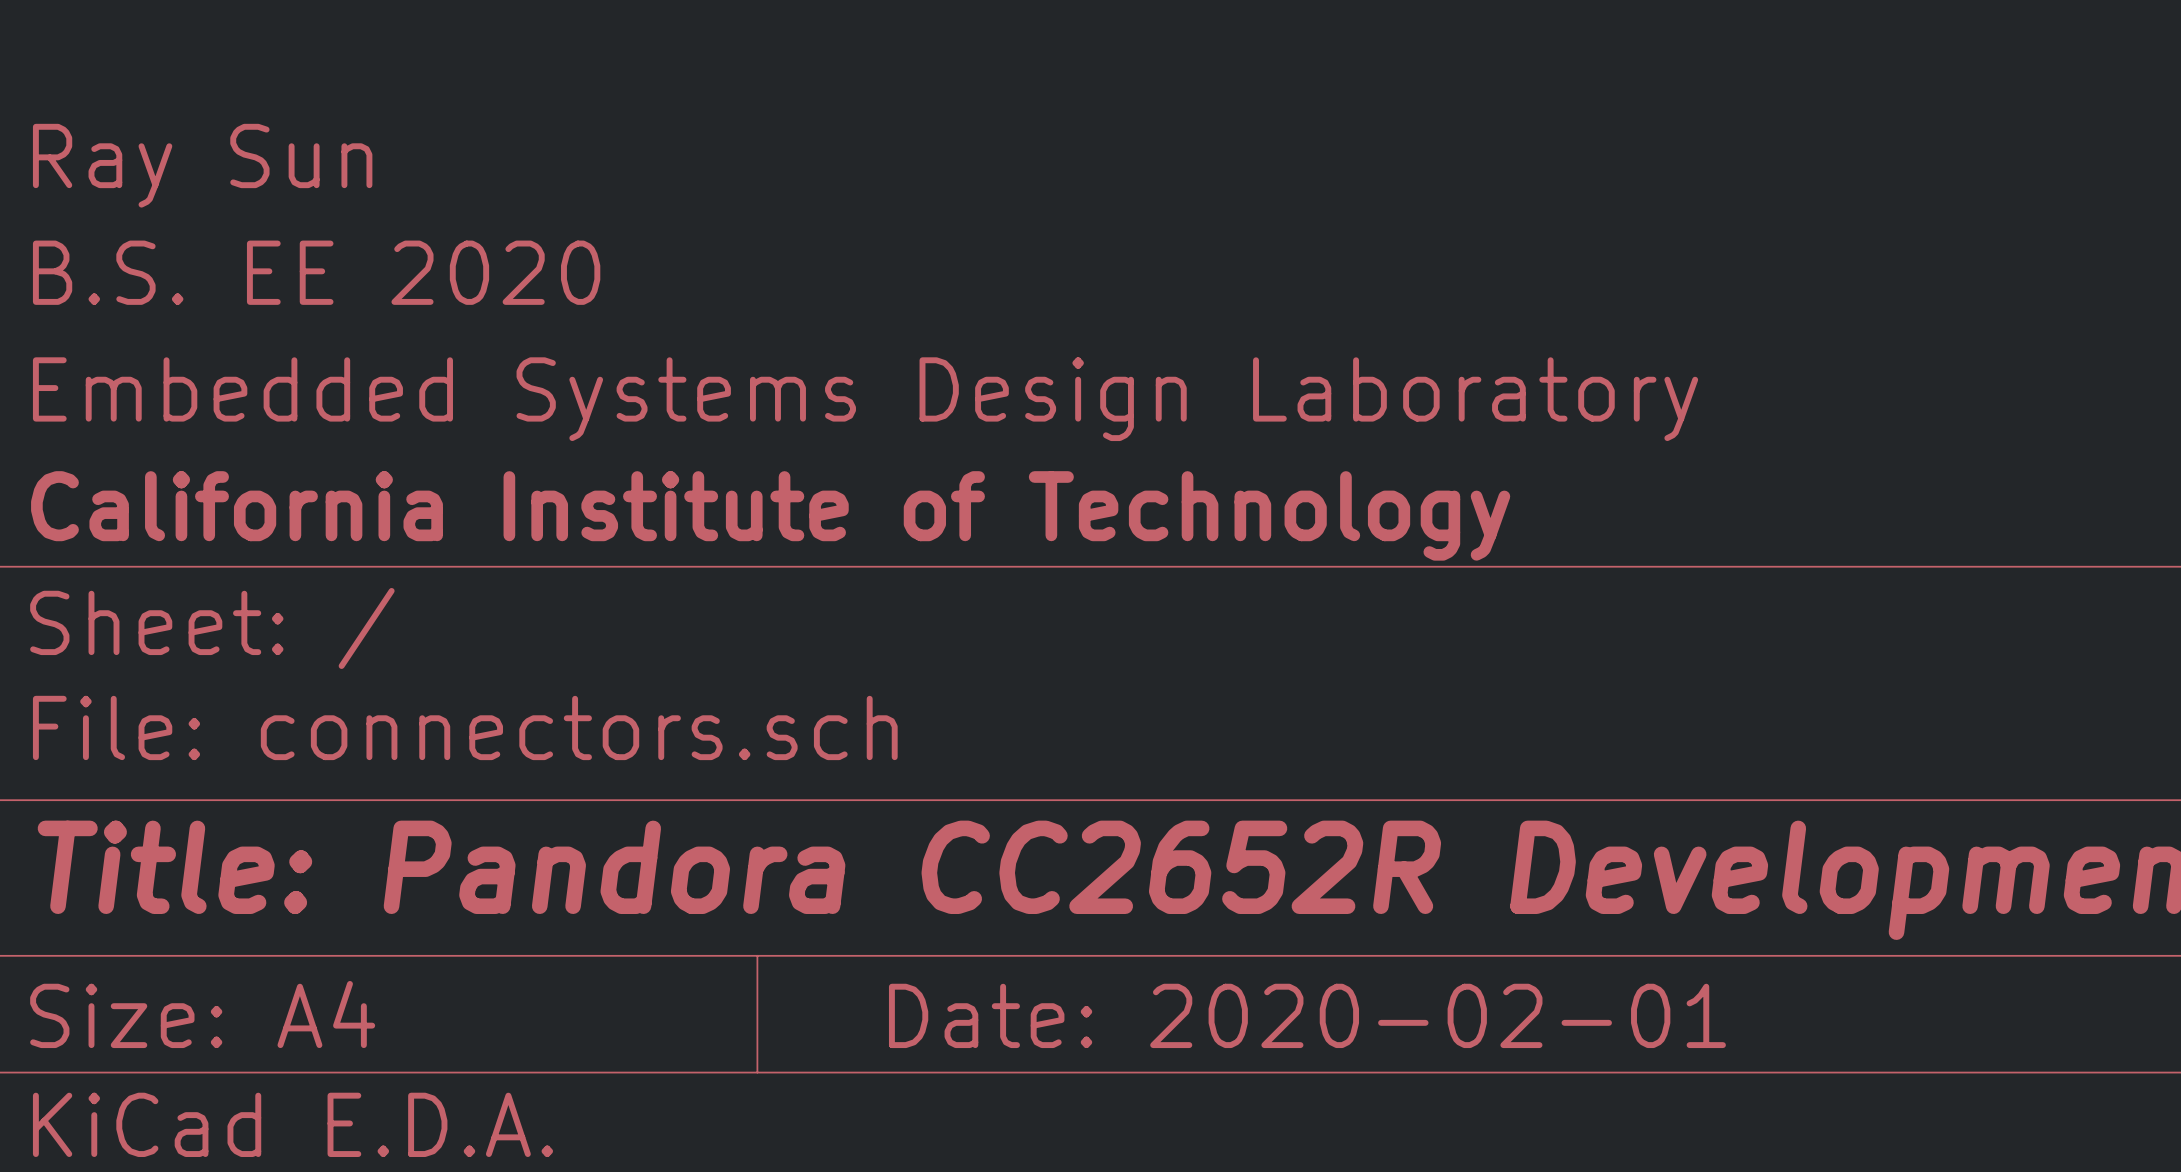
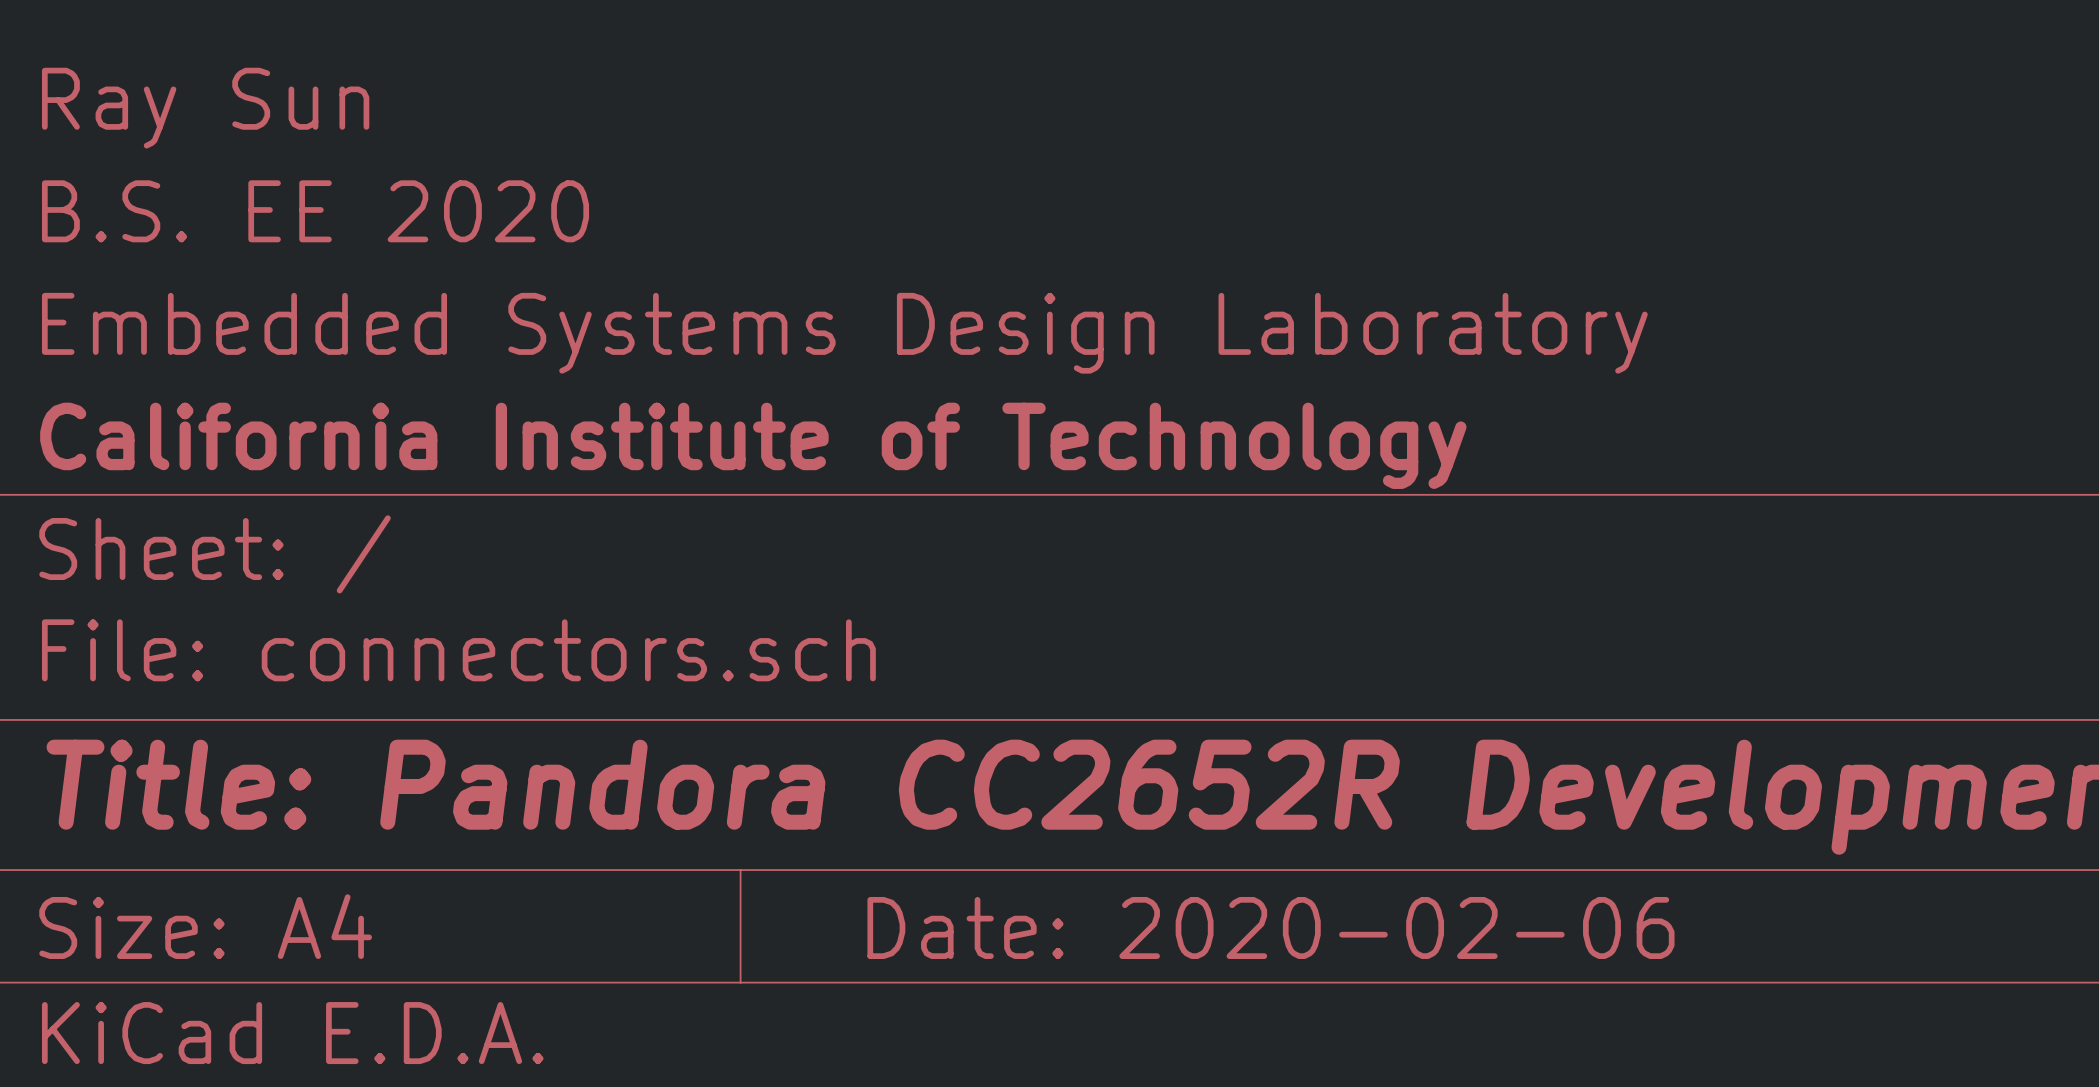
title block: Date: 2020-02-01 (1307, 1015) -> Date: 2020-02-06 (1270, 927)

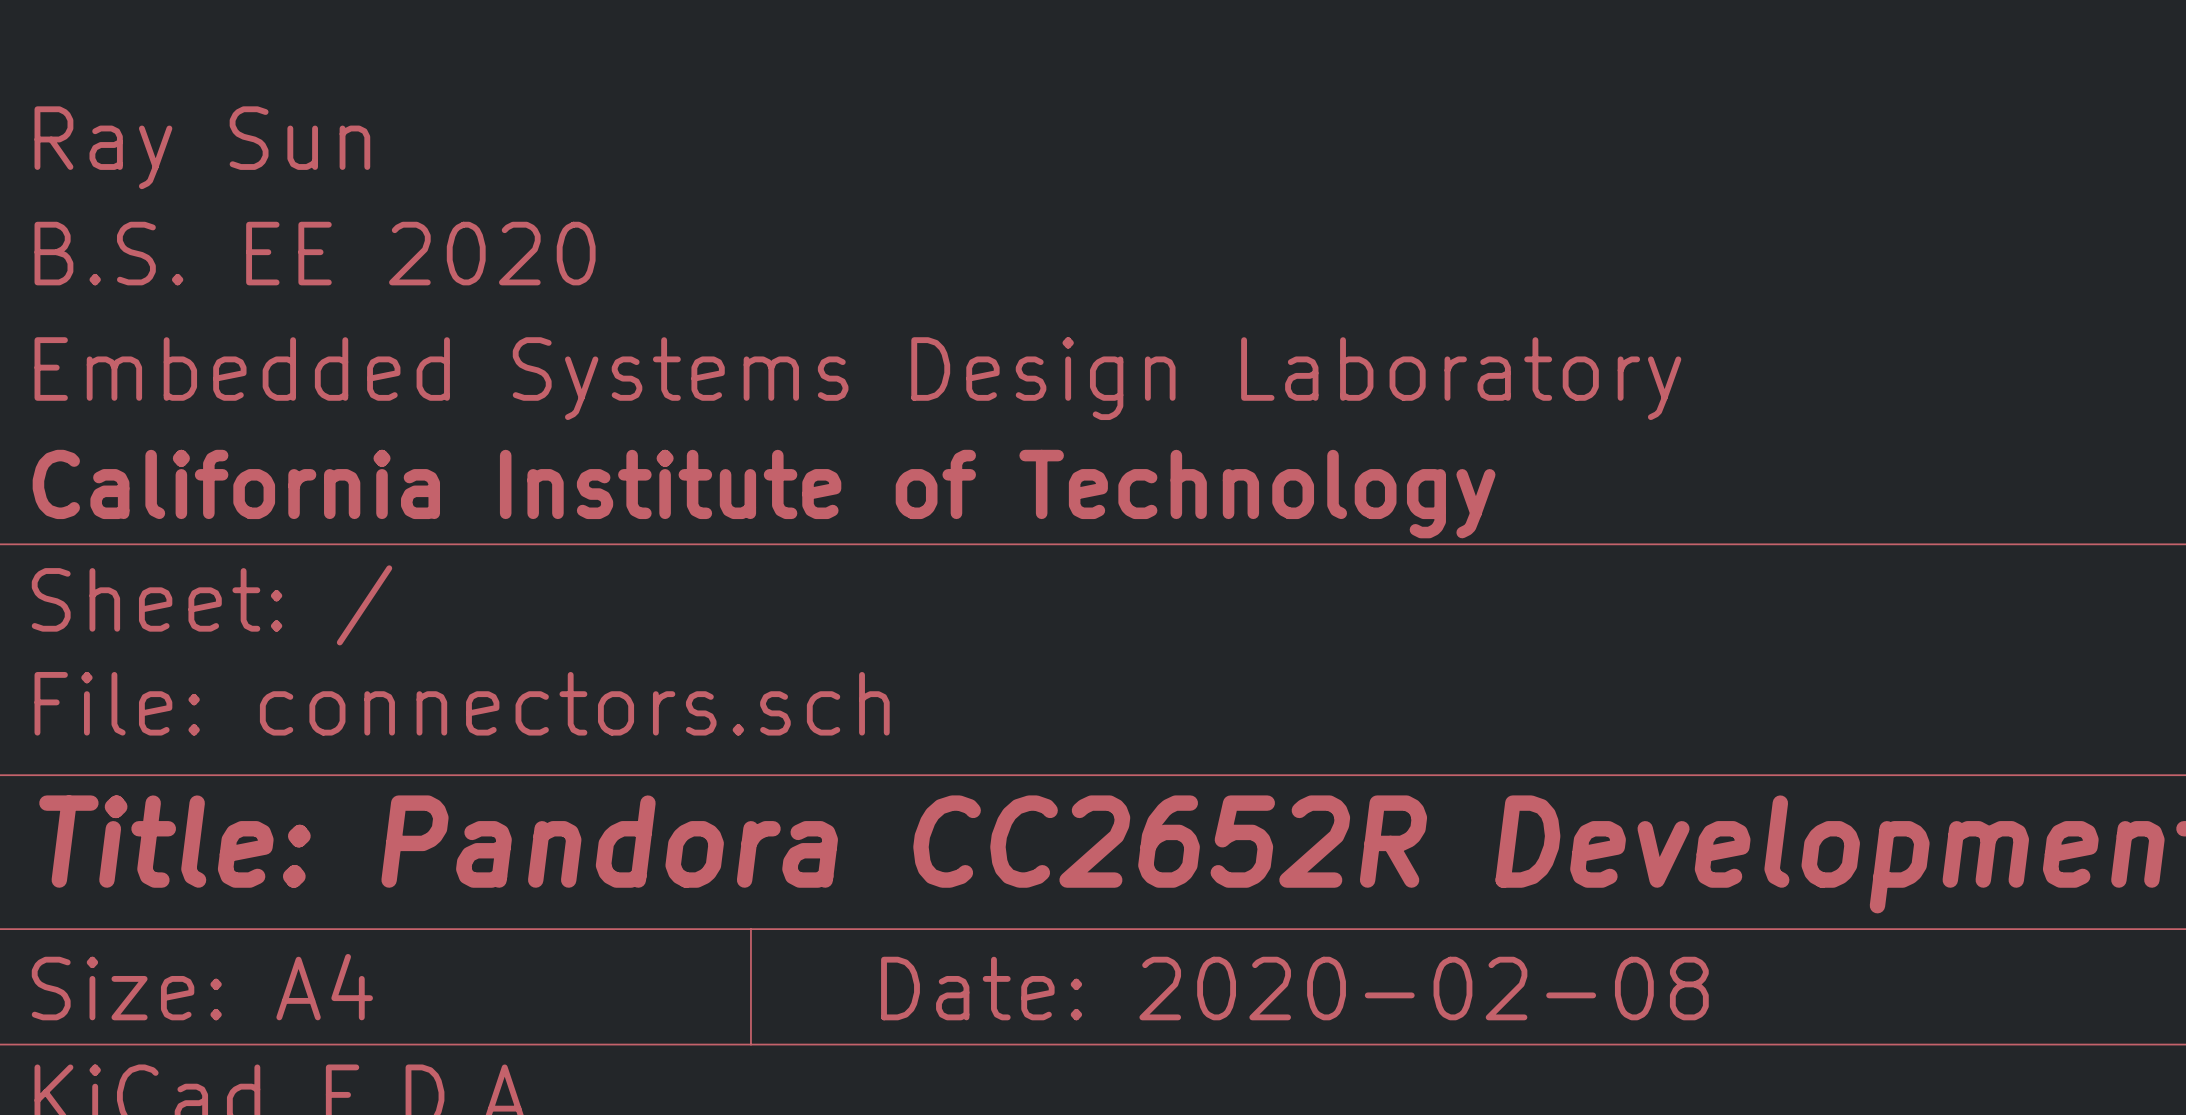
title block: Date: 2020-02-06 (1270, 927) -> Date: 2020-02-08 (1294, 988)

